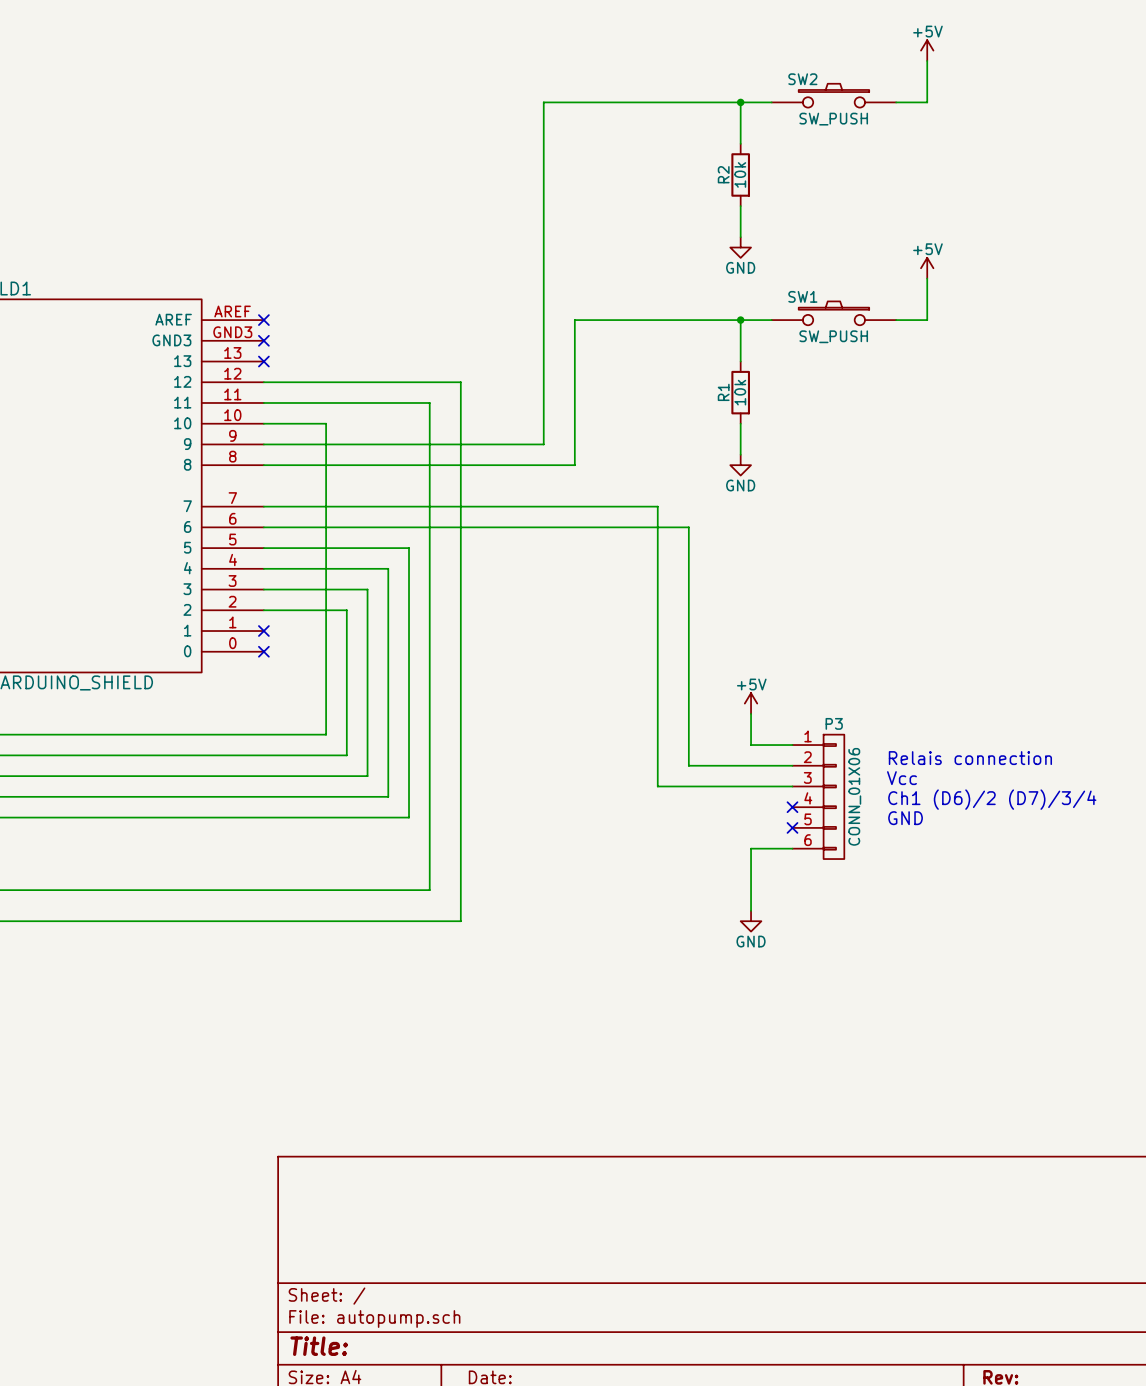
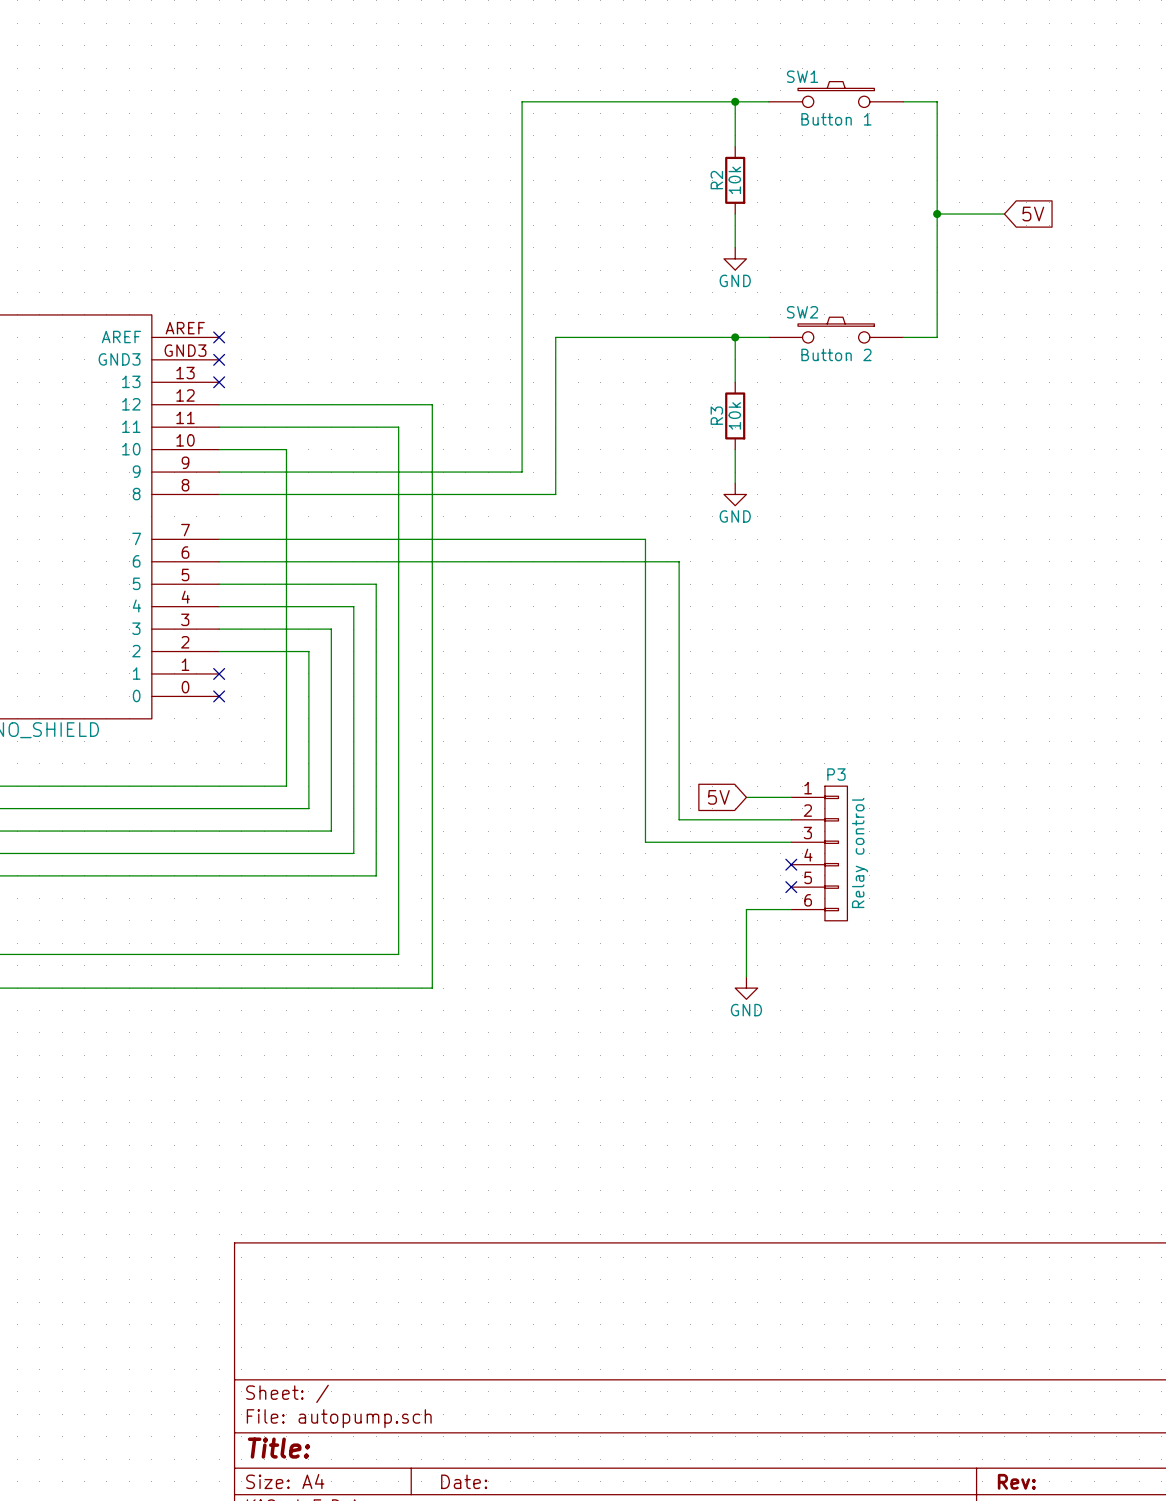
power symbol: +5V (927, 50) -> none
wire: (927, 60) (927, 102) -> (937, 292) (937, 101)
SW2 name: SW2 (802, 79) -> SW1 (802, 76)
SW2 value: SW_PUSH (833, 119) -> Button 1 (836, 119)
wire: none -> (937, 214) (1004, 214)
junction: none -> (937, 214)
global label: none -> 5V (1033, 214)
power symbol: +5V (927, 268) -> none
SW1 name: SW1 (802, 296) -> SW2 (802, 312)
SW1 value: SW_PUSH (833, 336) -> Button 2 (836, 354)
R1 name: R1 (723, 392) -> R3 (716, 415)
power symbol: +5V (751, 703) -> none
wire: (751, 713) (751, 745) -> none
global label: none -> 5V (718, 797)
text: Relais connection (970, 758) -> none
text: Vcc (901, 778) -> none
P3 value: CONN_01X06 (854, 796) -> Relay control (860, 852)
text: Ch1 (D6)/2 (D7)/3/4 (992, 799) -> none
text: GND (905, 818) -> none

